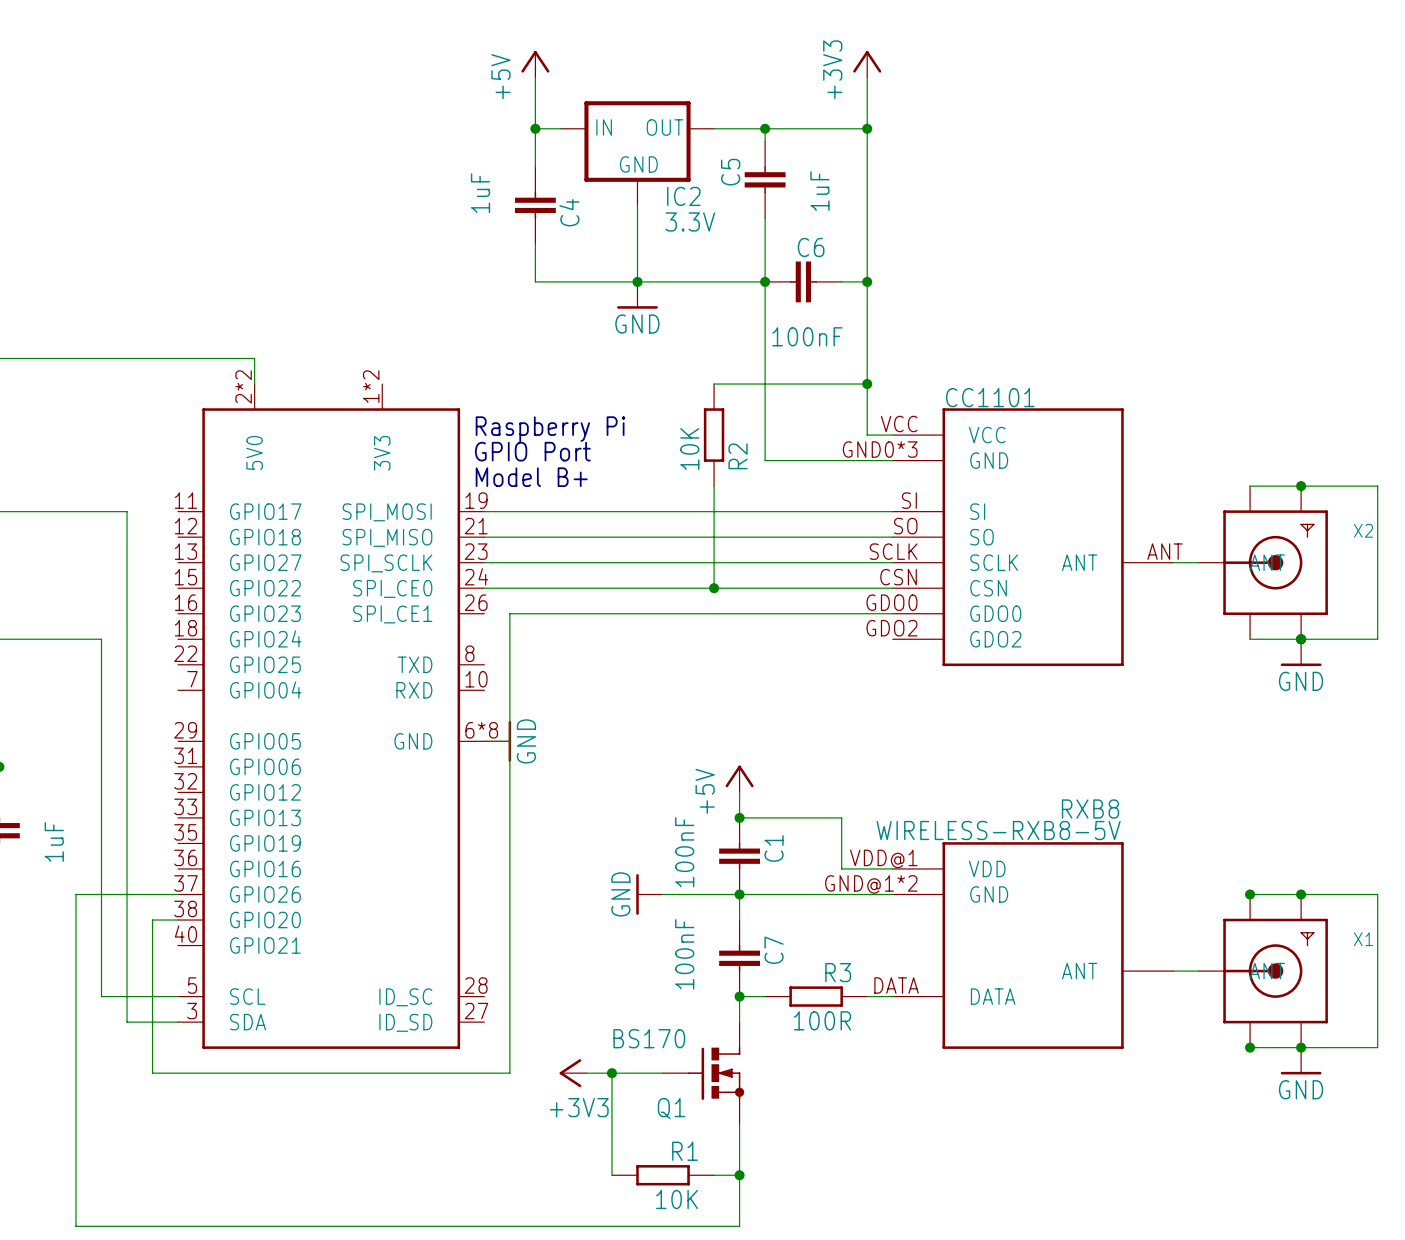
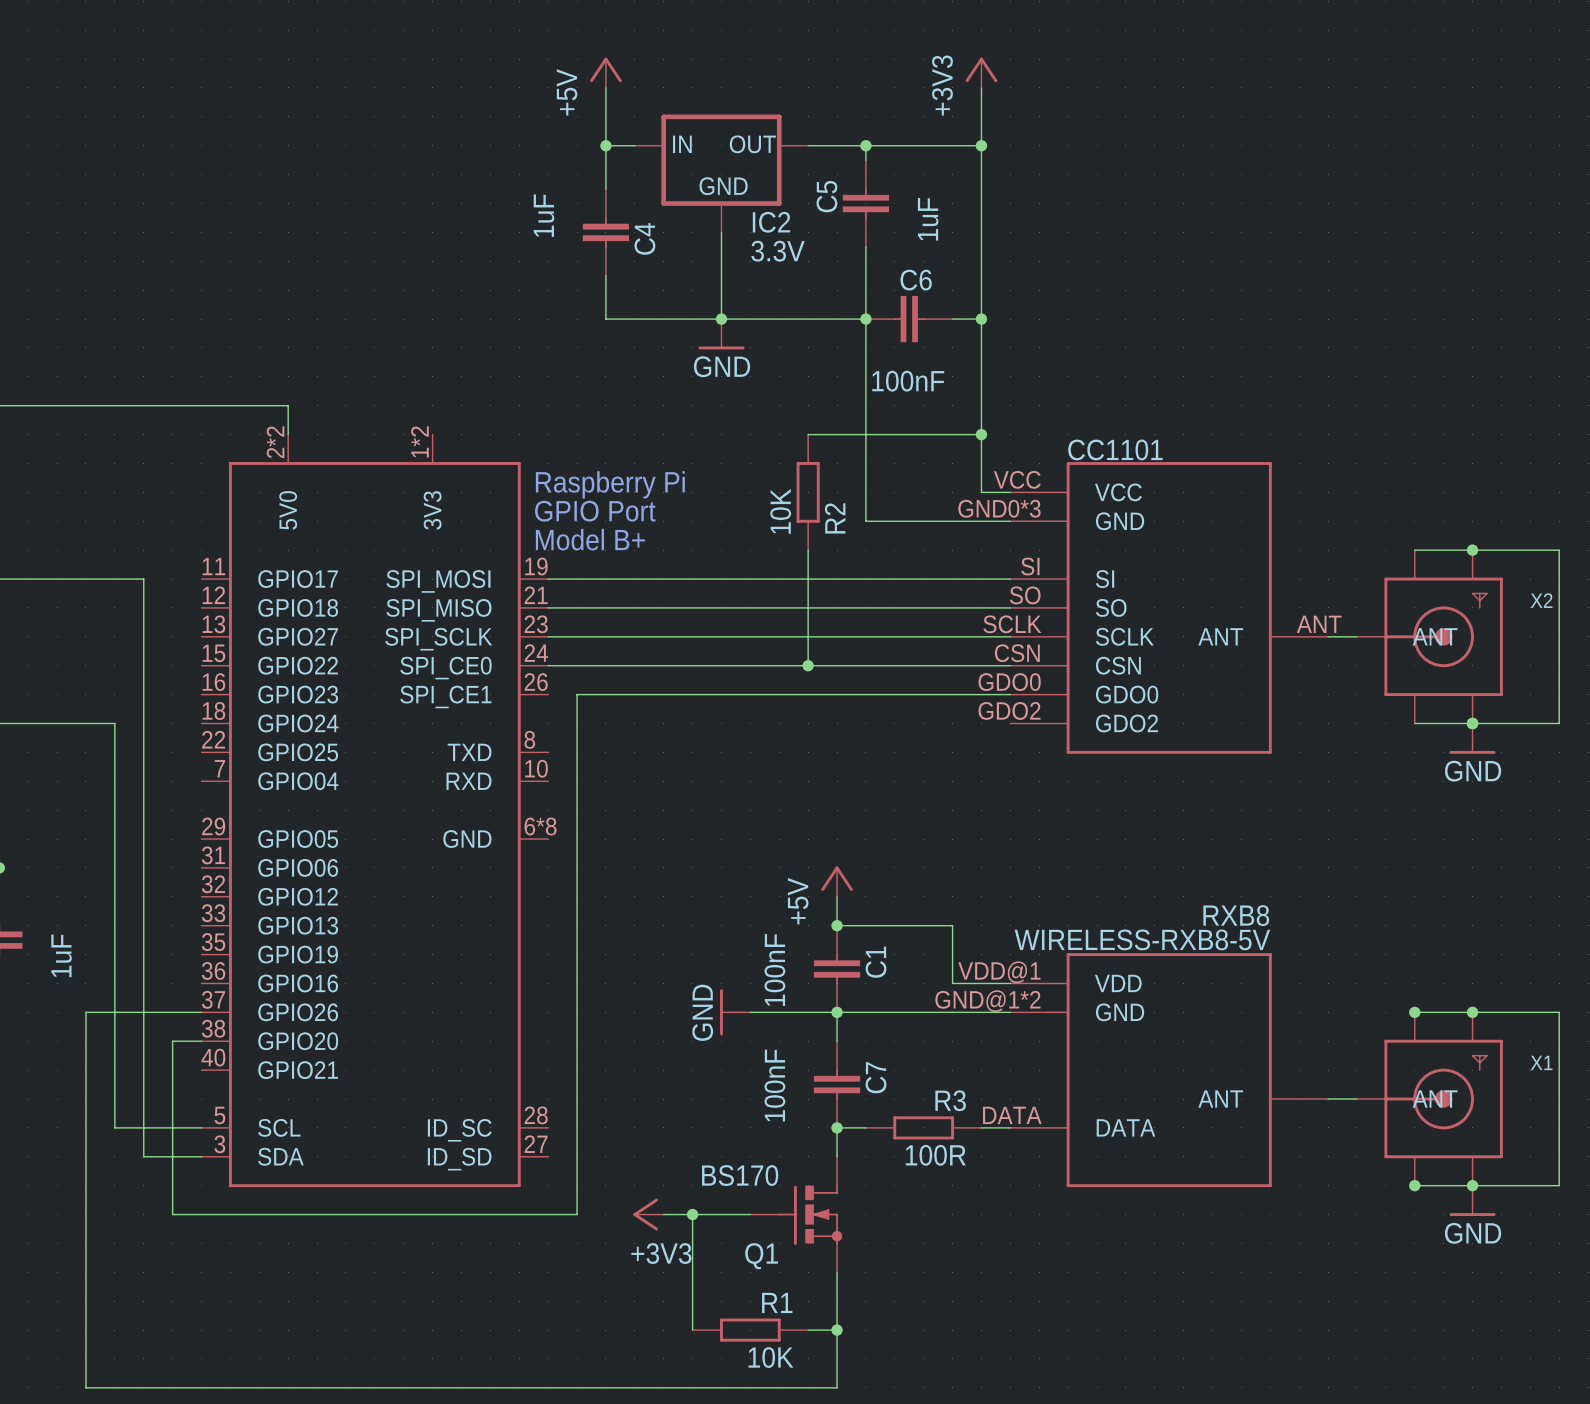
wire: (484, 741) (509, 741) -> none
power symbol: GND (497, 741) -> none

